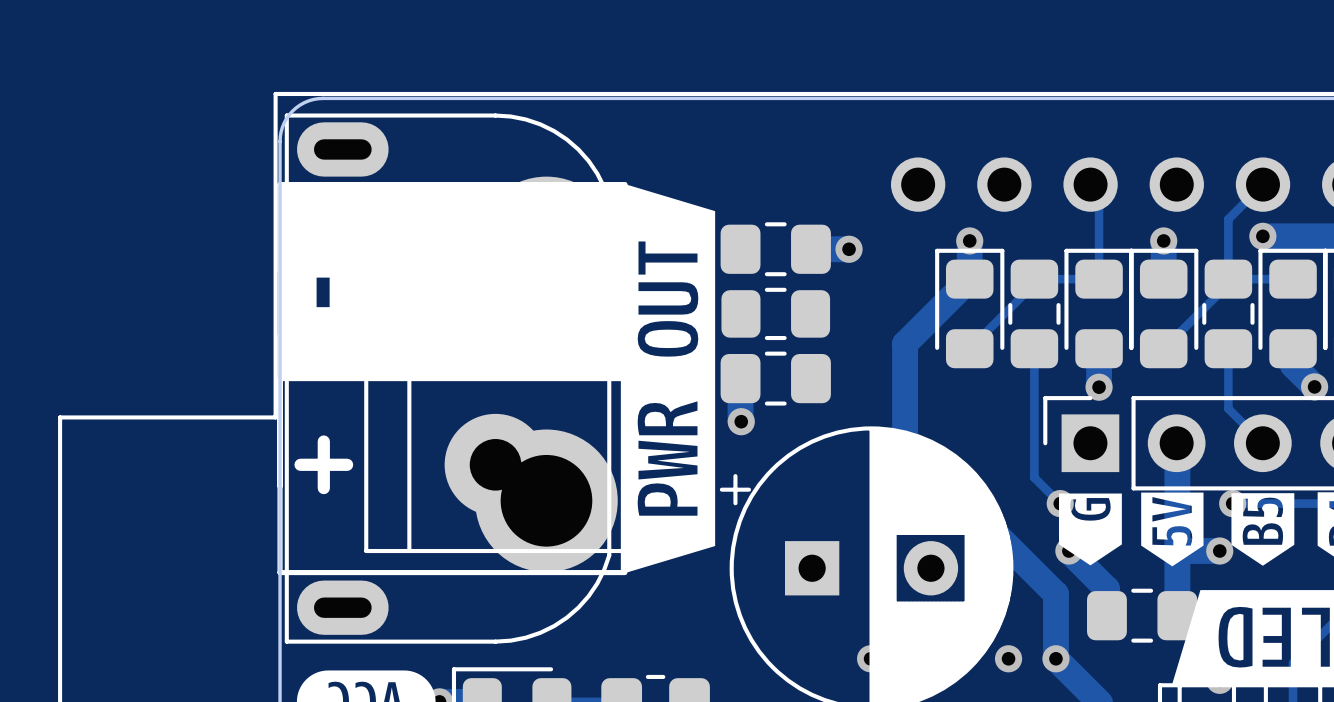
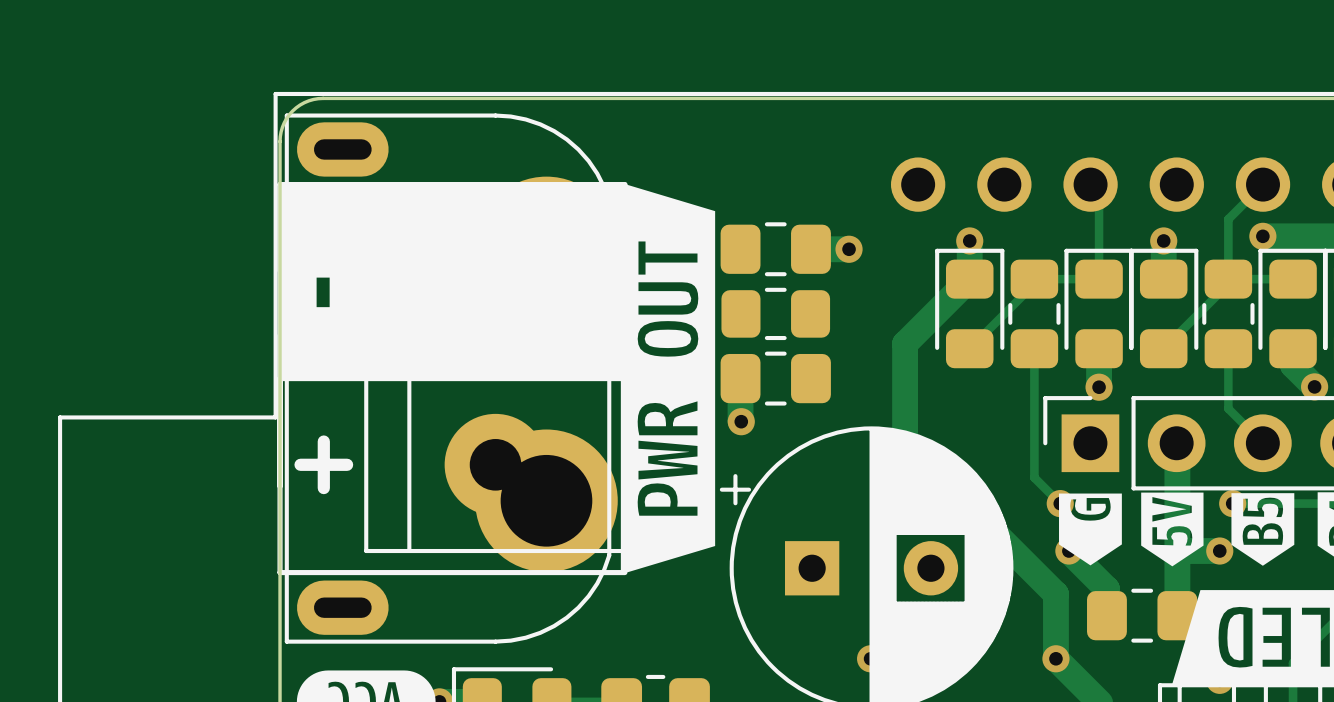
via: (1008, 658) -> none

